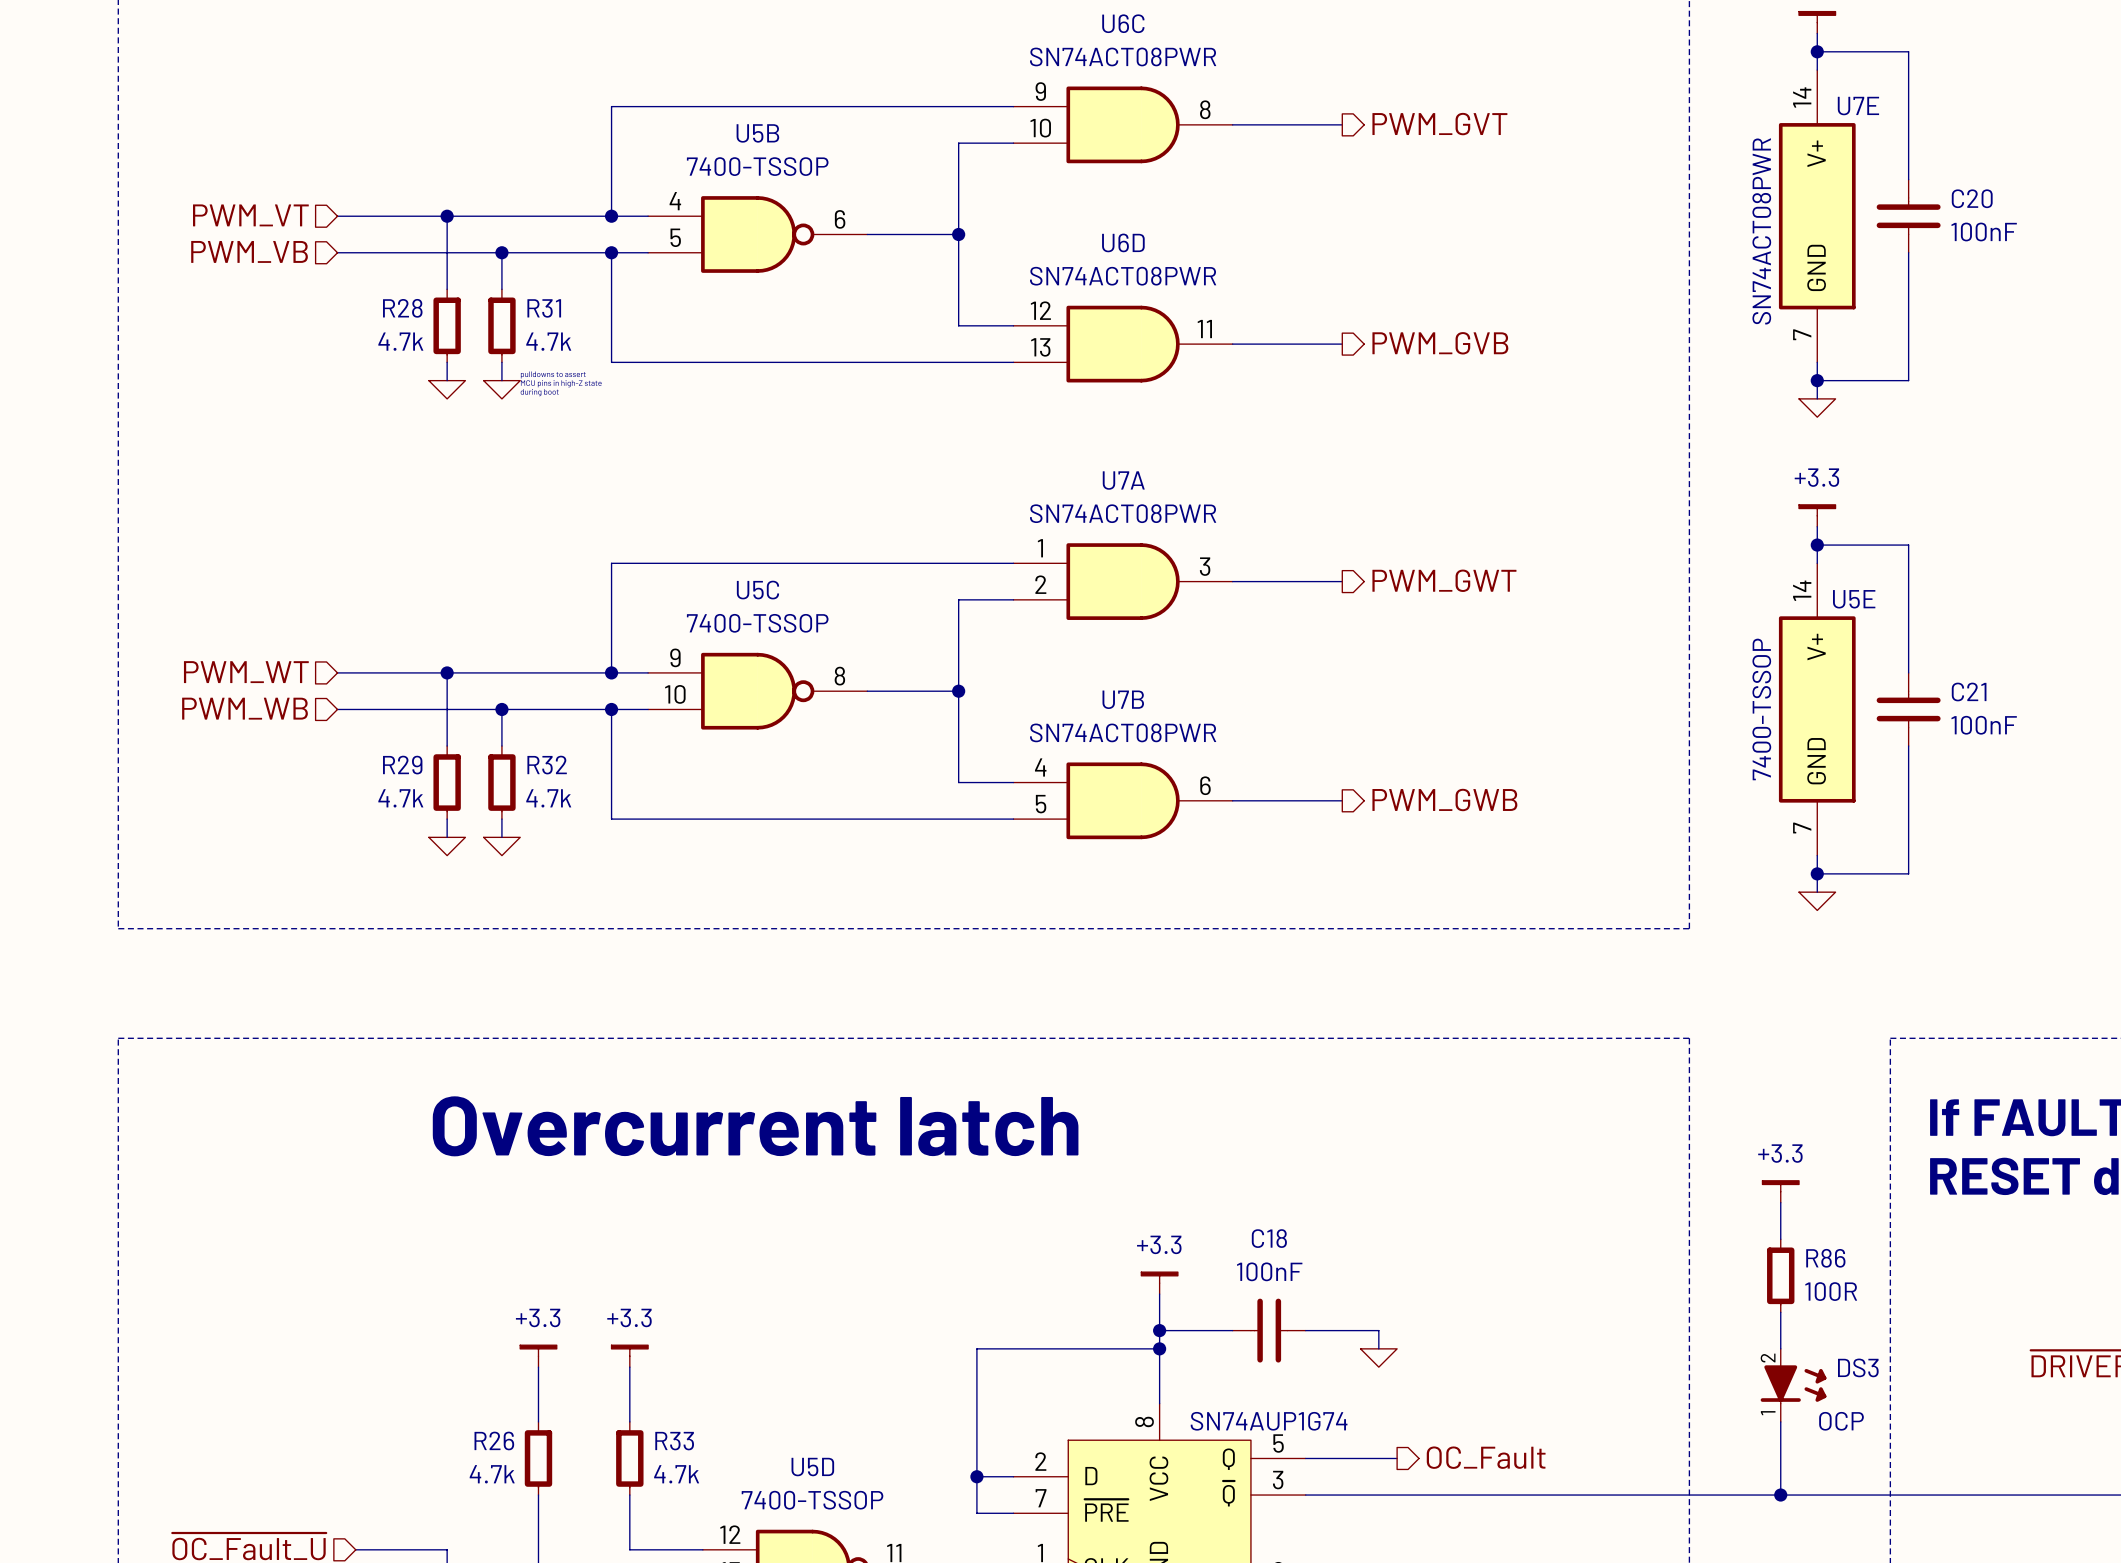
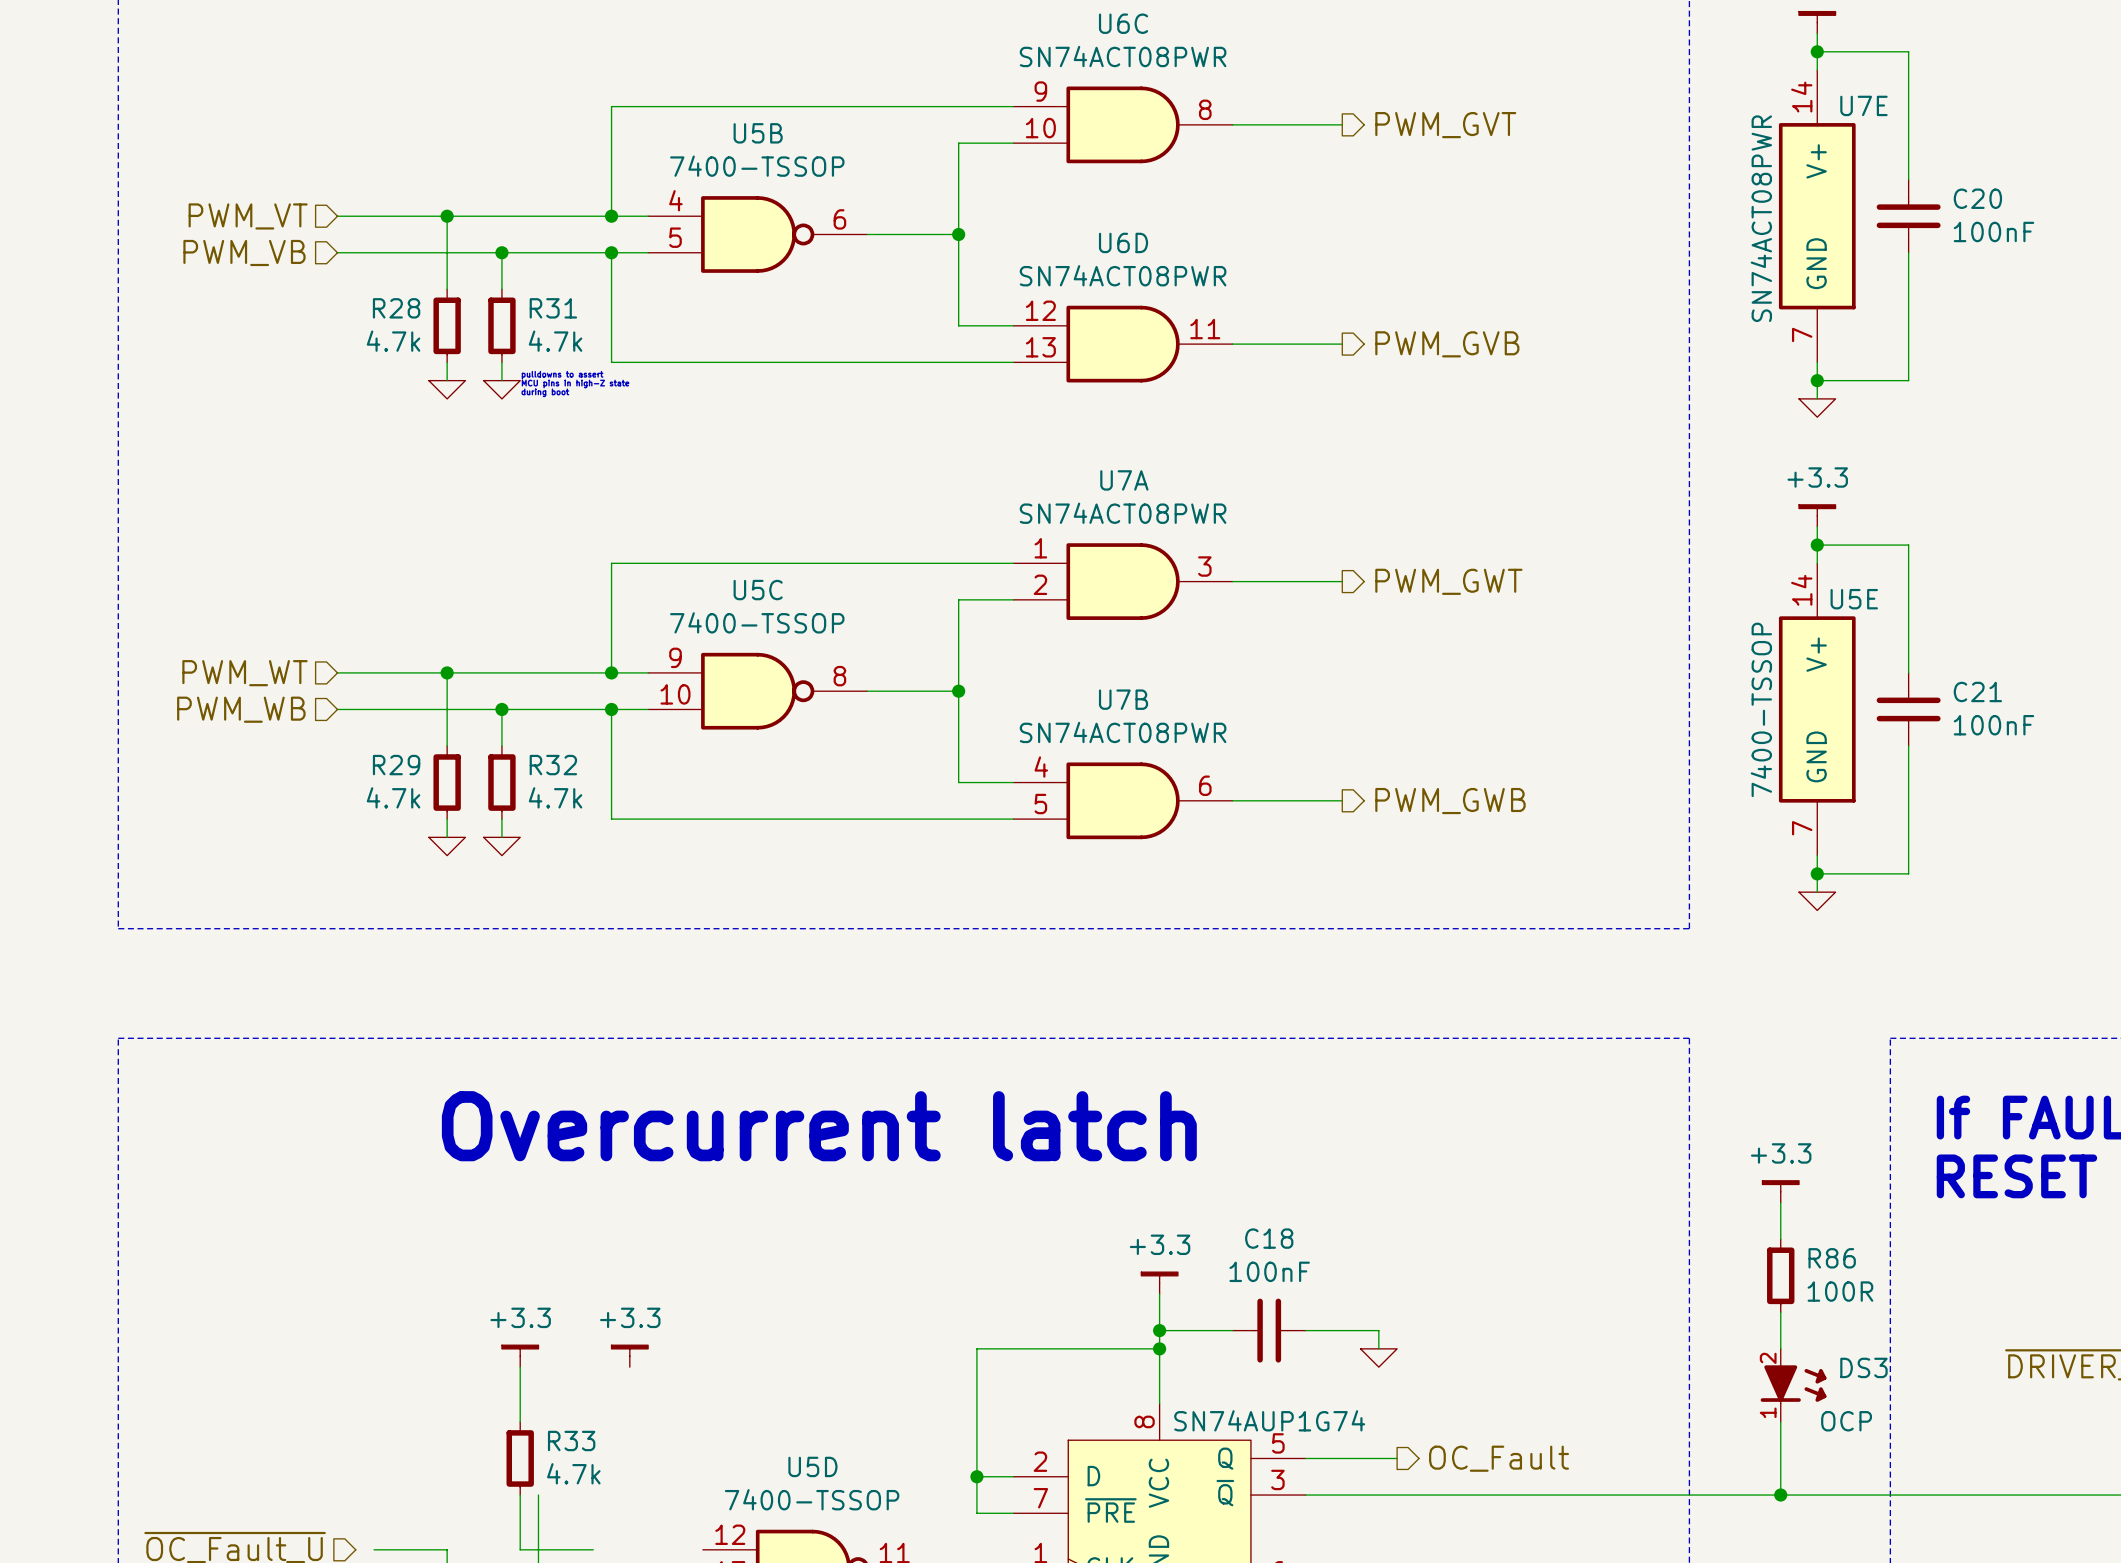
power symbol position: +3.3 (538, 1356) -> +3.3 (520, 1356)
wire: (538, 1367) (538, 1421) -> none
wire: (629, 1367) (629, 1421) -> (520, 1367) (520, 1421)
R26: 4.7k (538, 1458) -> none
R33 position: (629, 1458) -> (520, 1458)
wire: (629, 1495) (629, 1549) (702, 1549) -> (520, 1495) (520, 1549) (593, 1549)
wire: (355, 1549) (374, 1549) -> none

